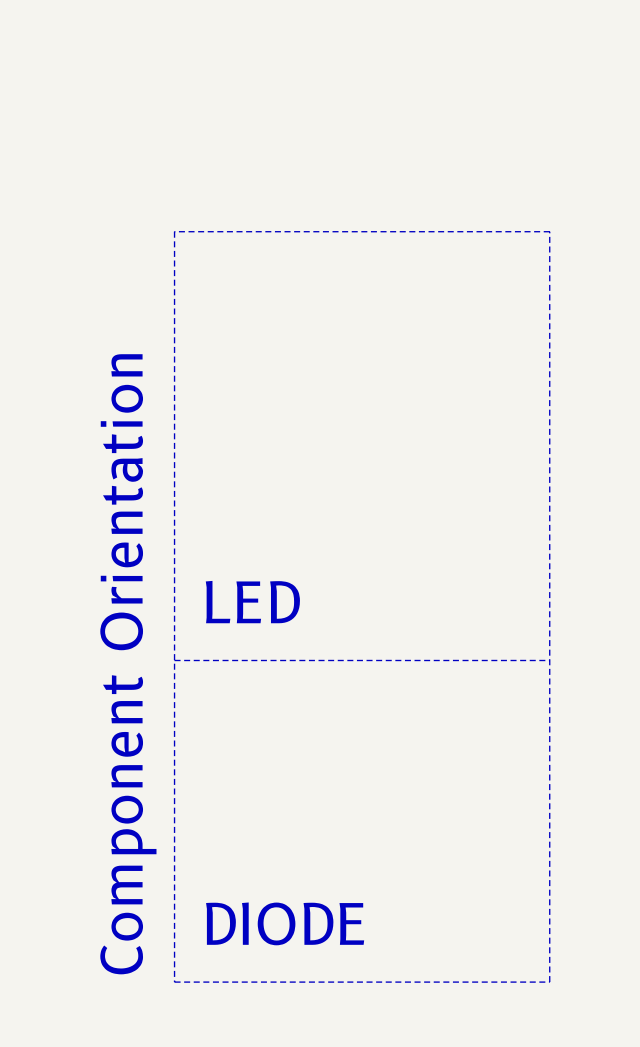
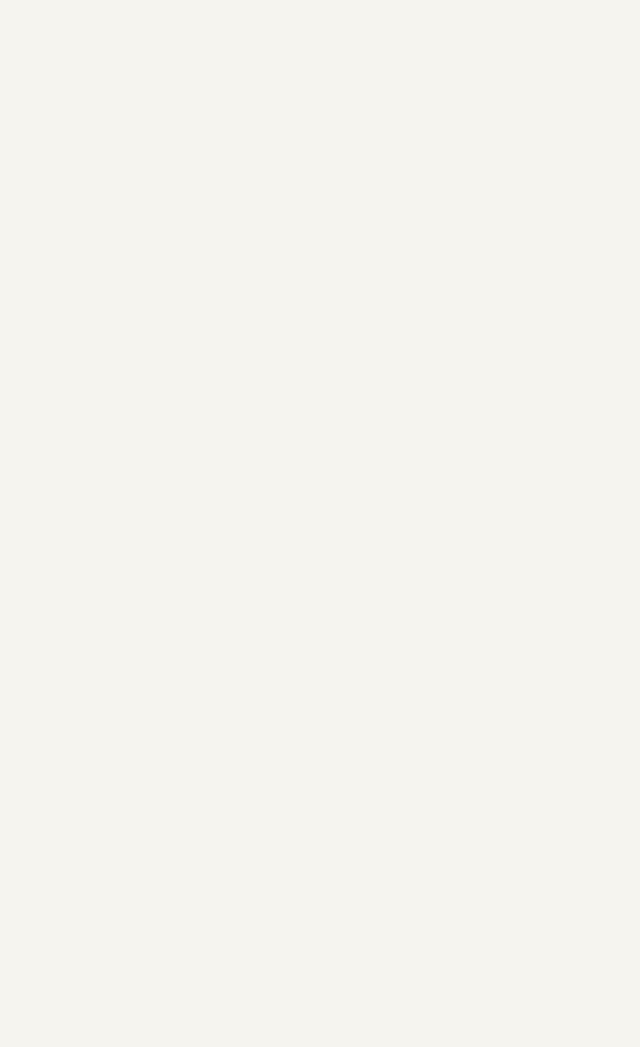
line: (174, 231) (549, 231) (549, 982) (174, 982) (174, 231) -> none
text: LED (252, 602) -> none
line: (174, 660) (549, 660) -> none
text: Component Orientation (128, 664) -> none
text: DIODE (285, 923) -> none

